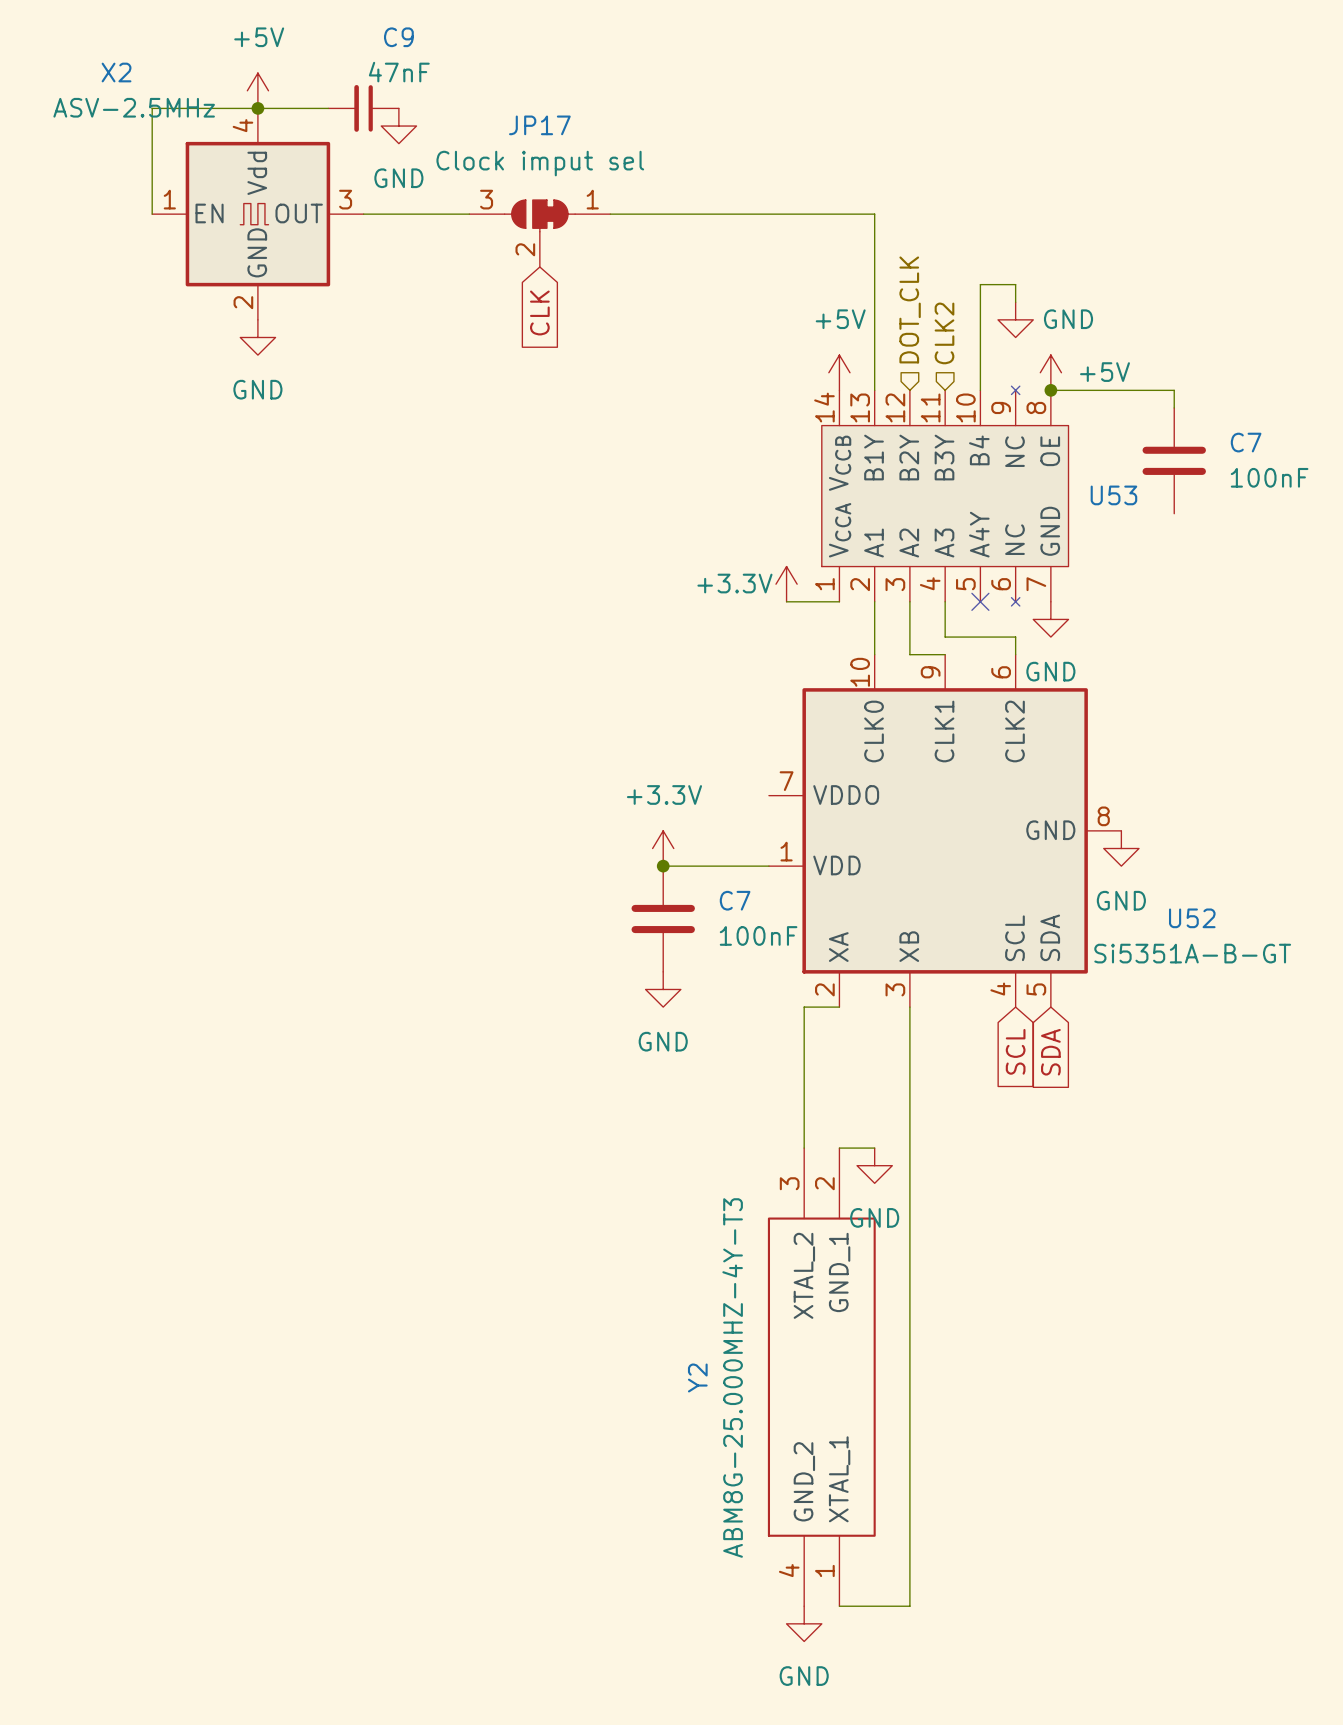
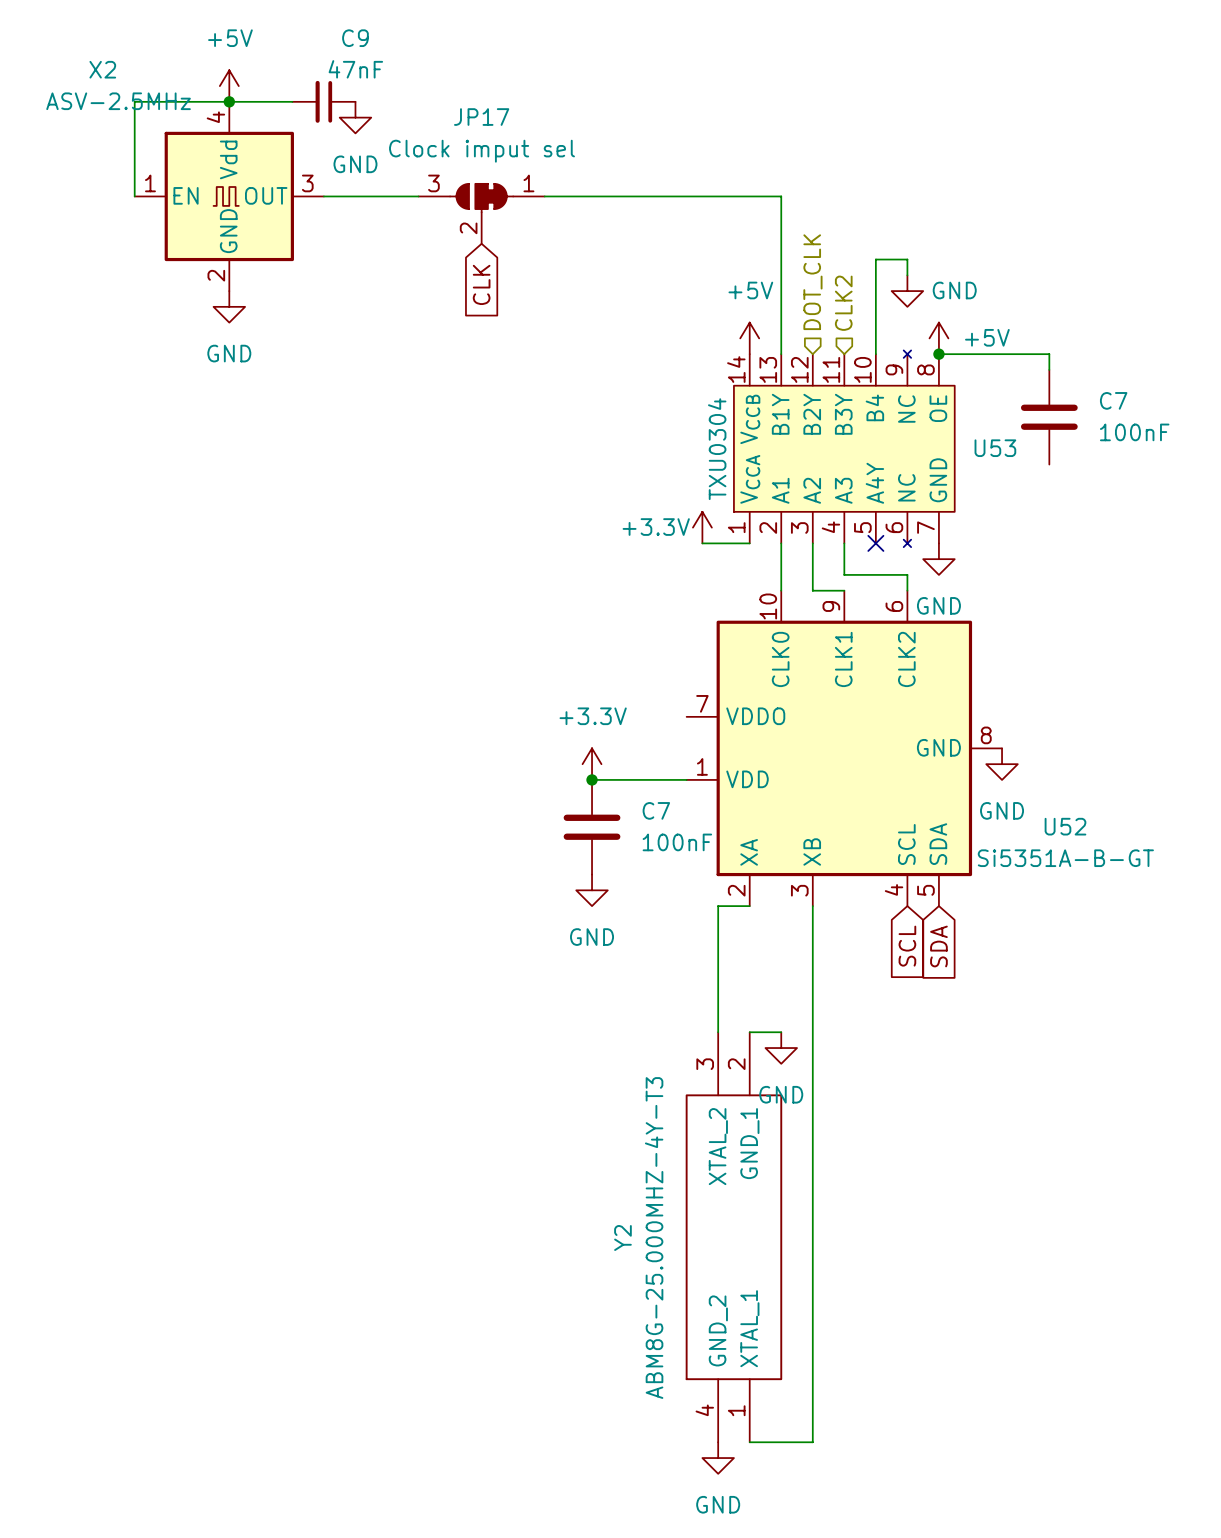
U53 value: none -> TXU0304 (717, 449)

